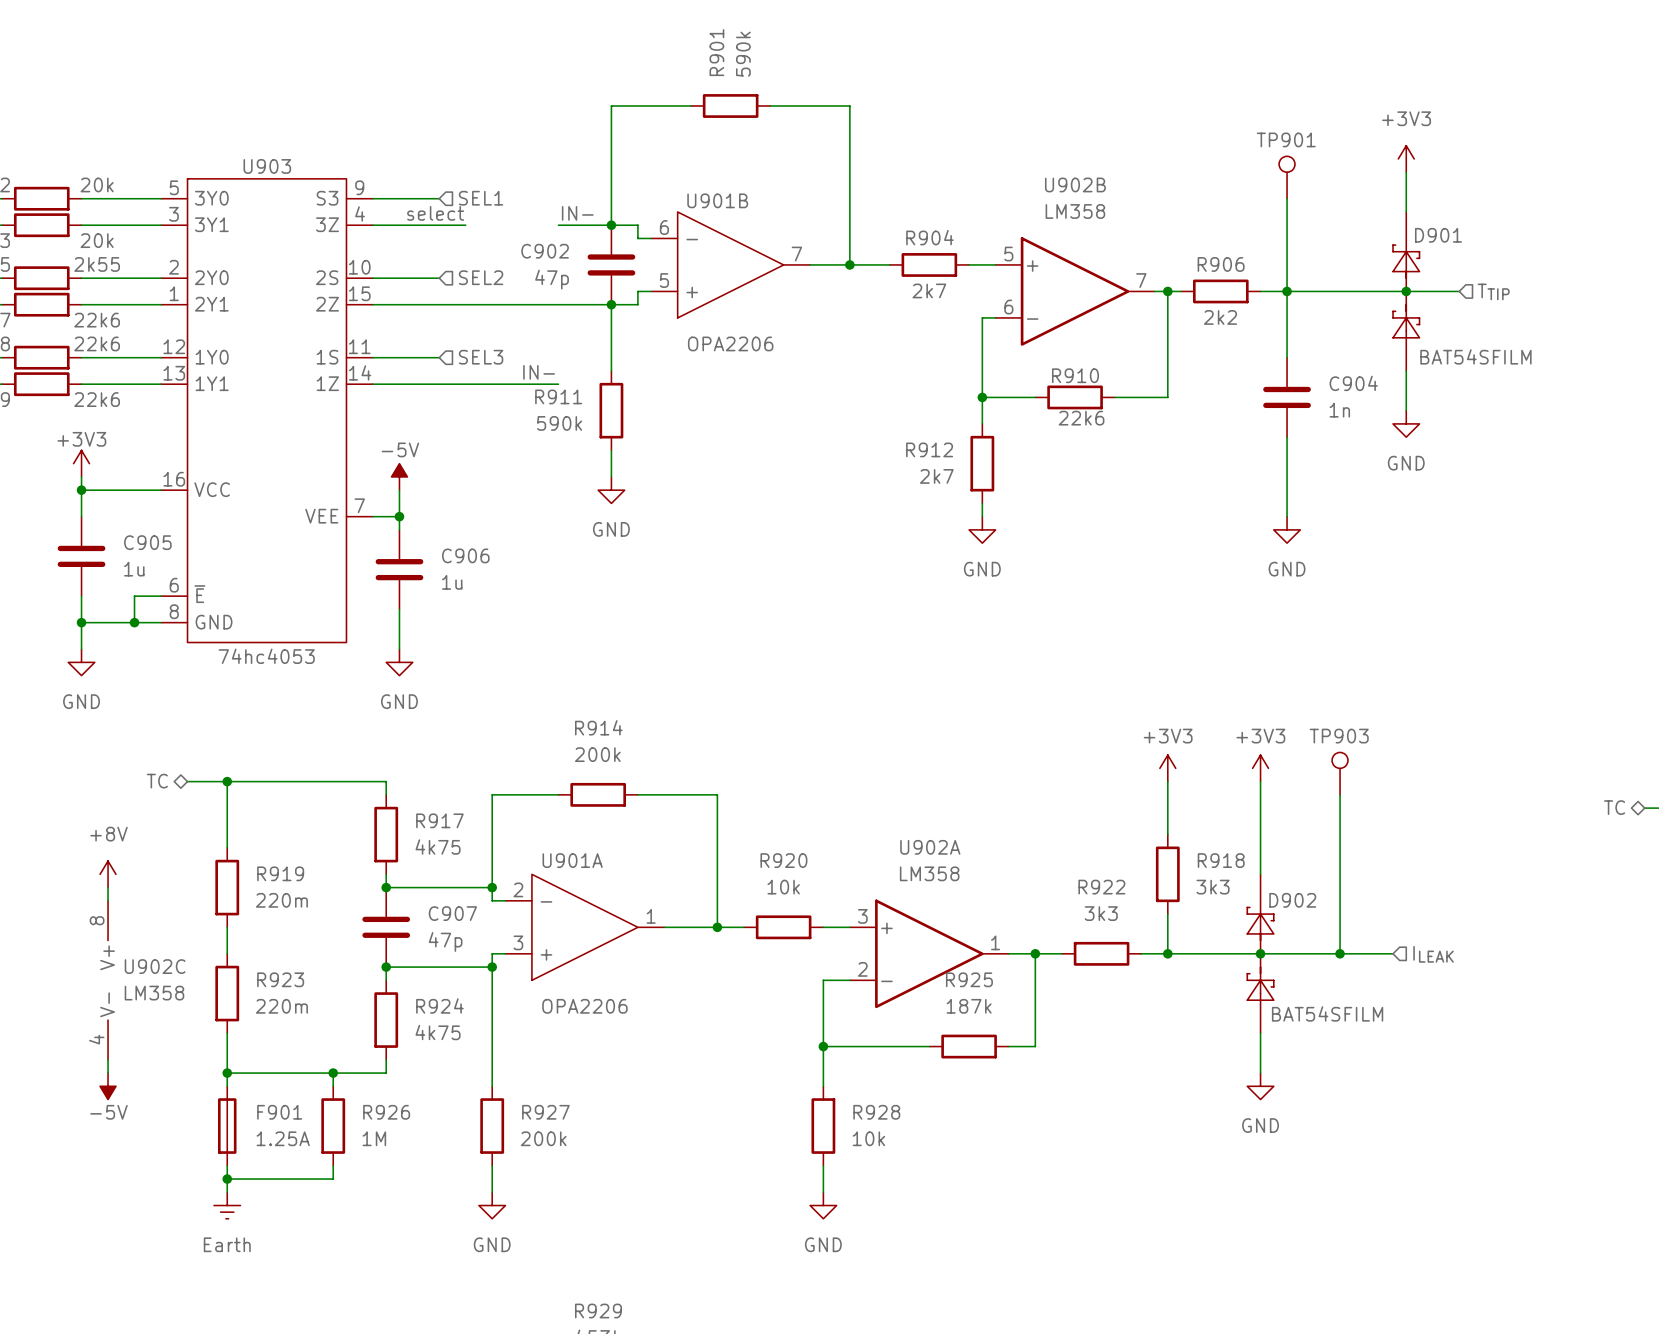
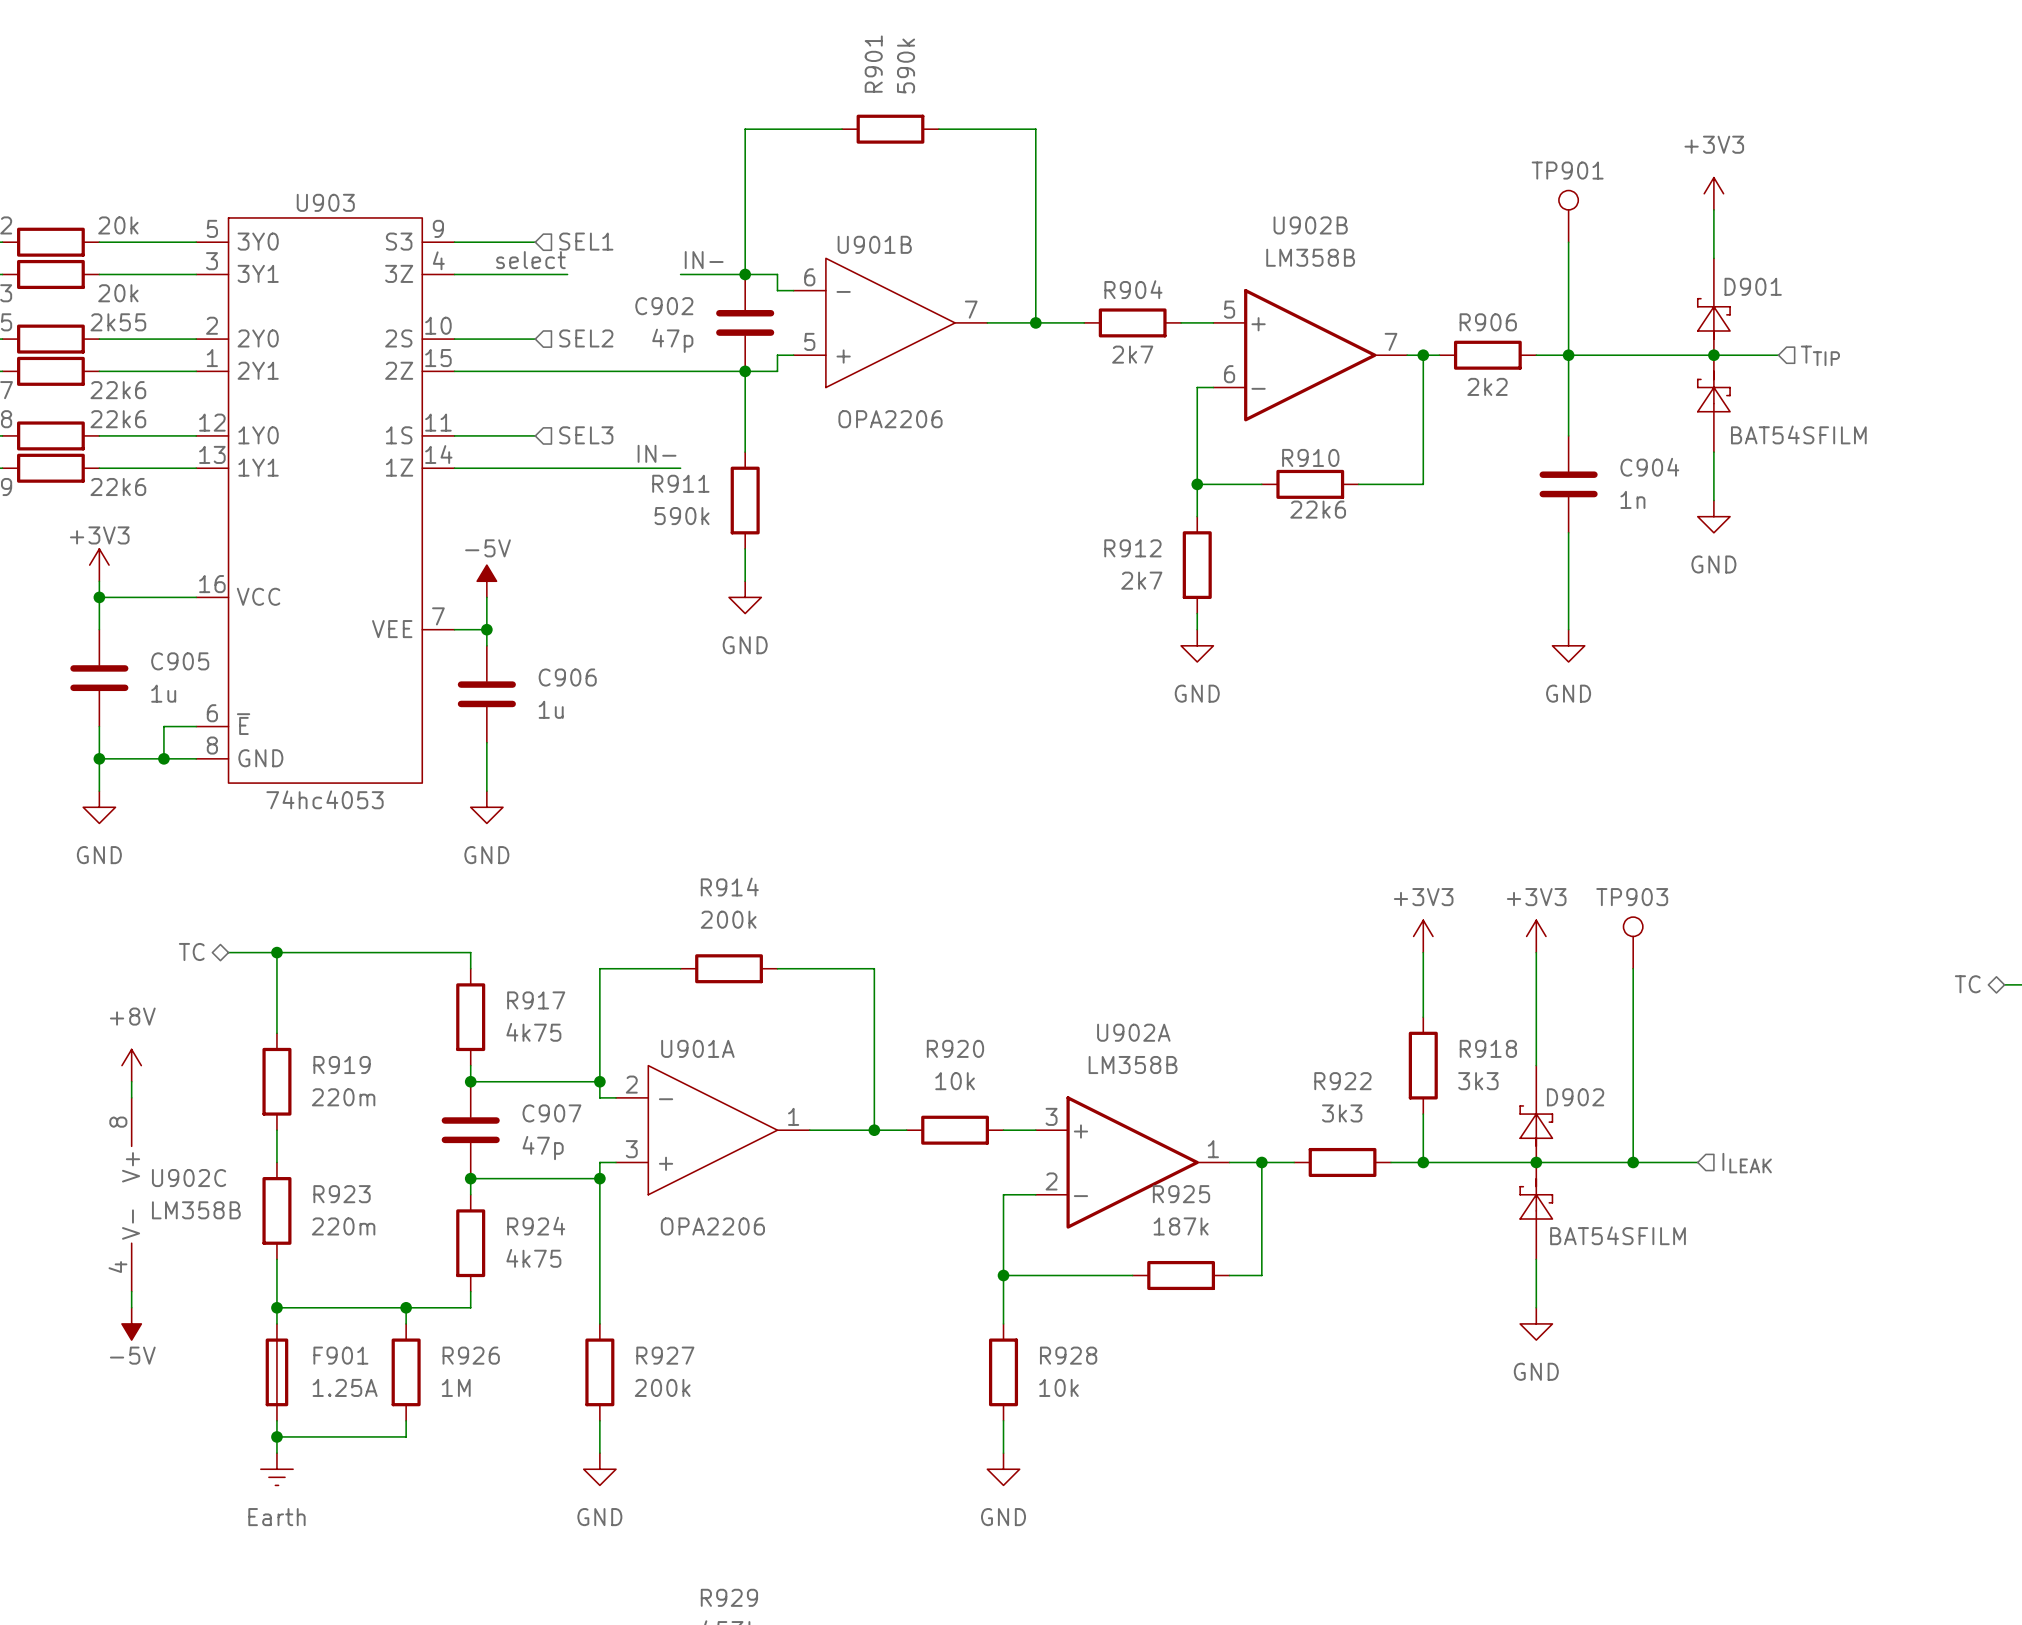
U902B value: LM358 (1075, 211) -> LM358B (1310, 257)
U902A value: LM358 (929, 873) -> LM358B (1133, 1065)
U902C value: LM358 (154, 993) -> LM358B (196, 1210)

